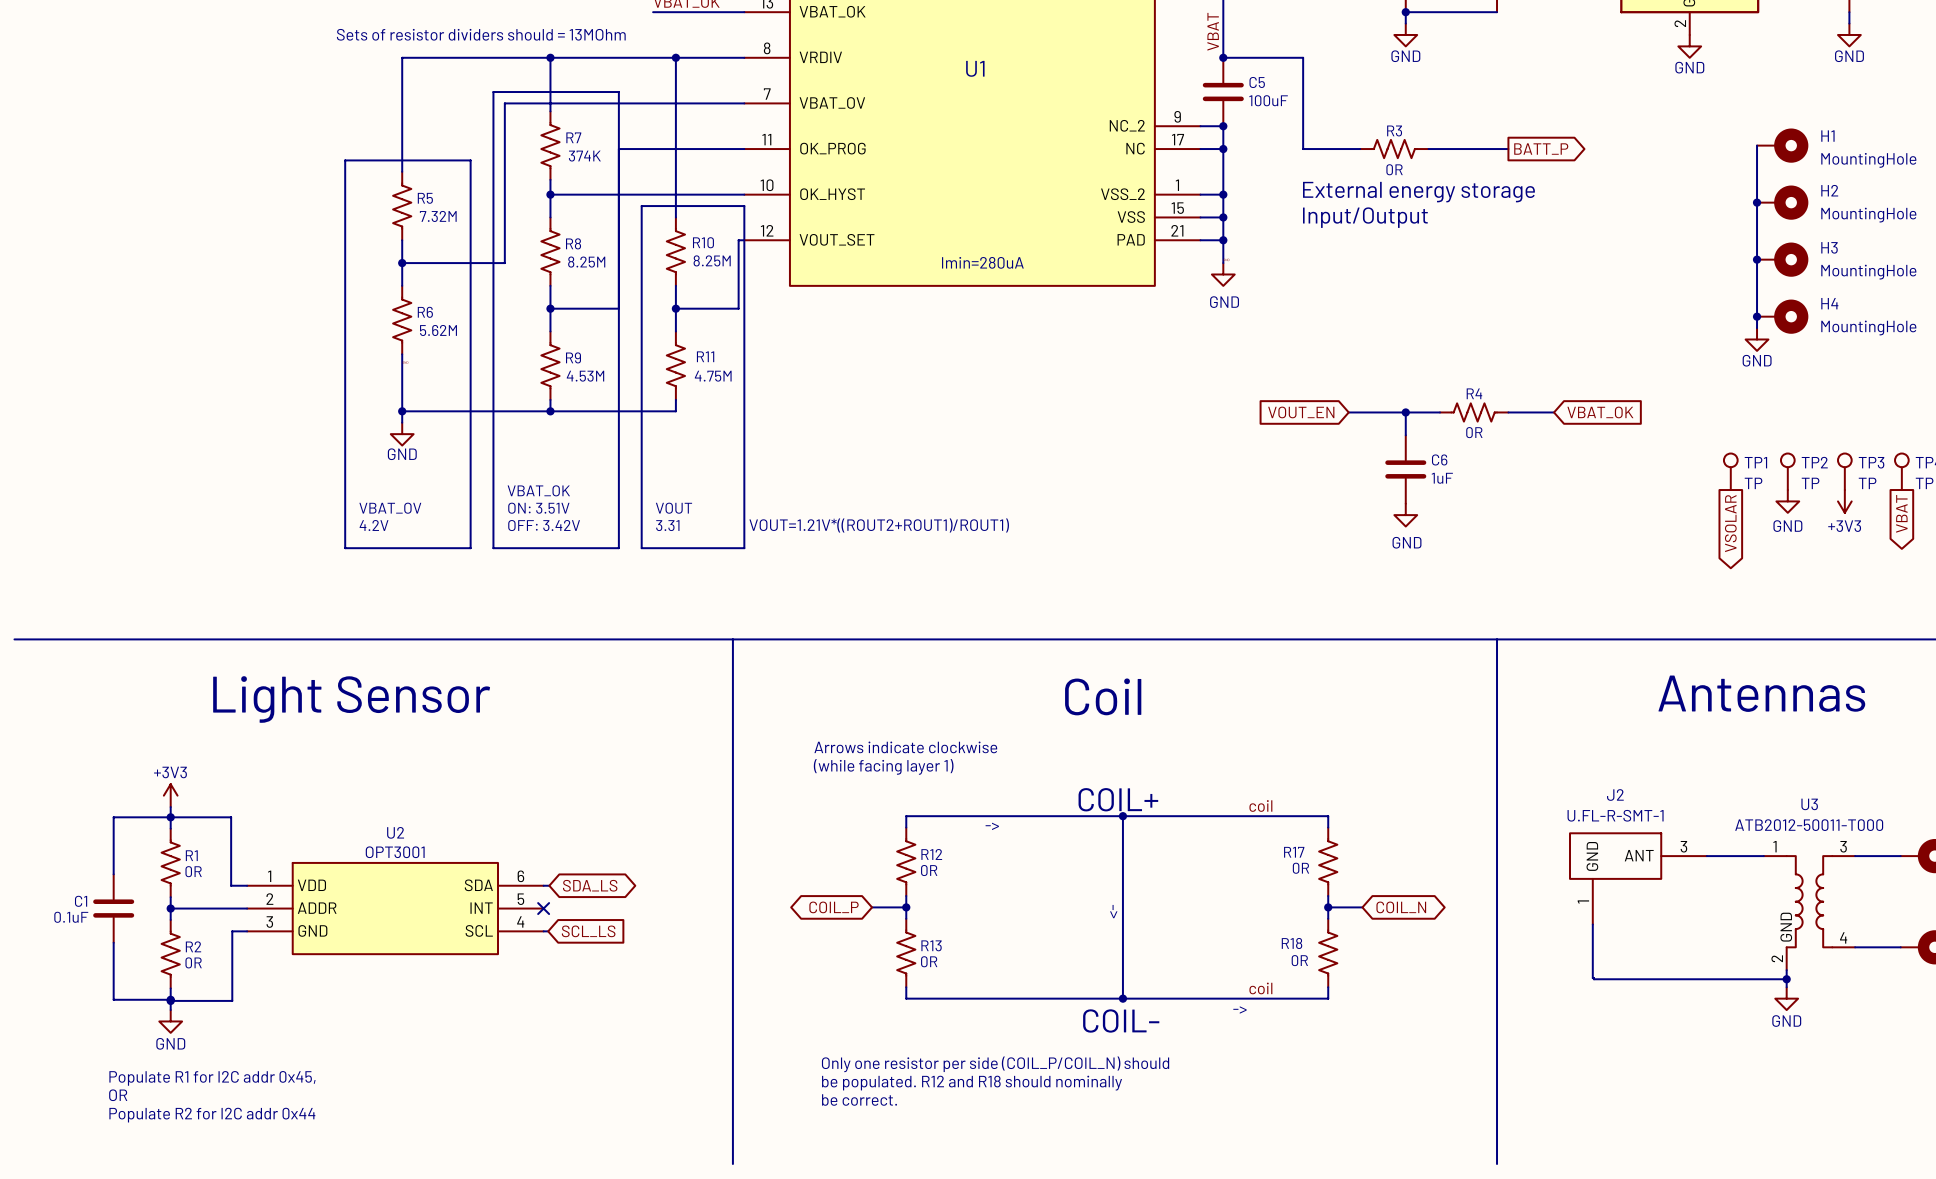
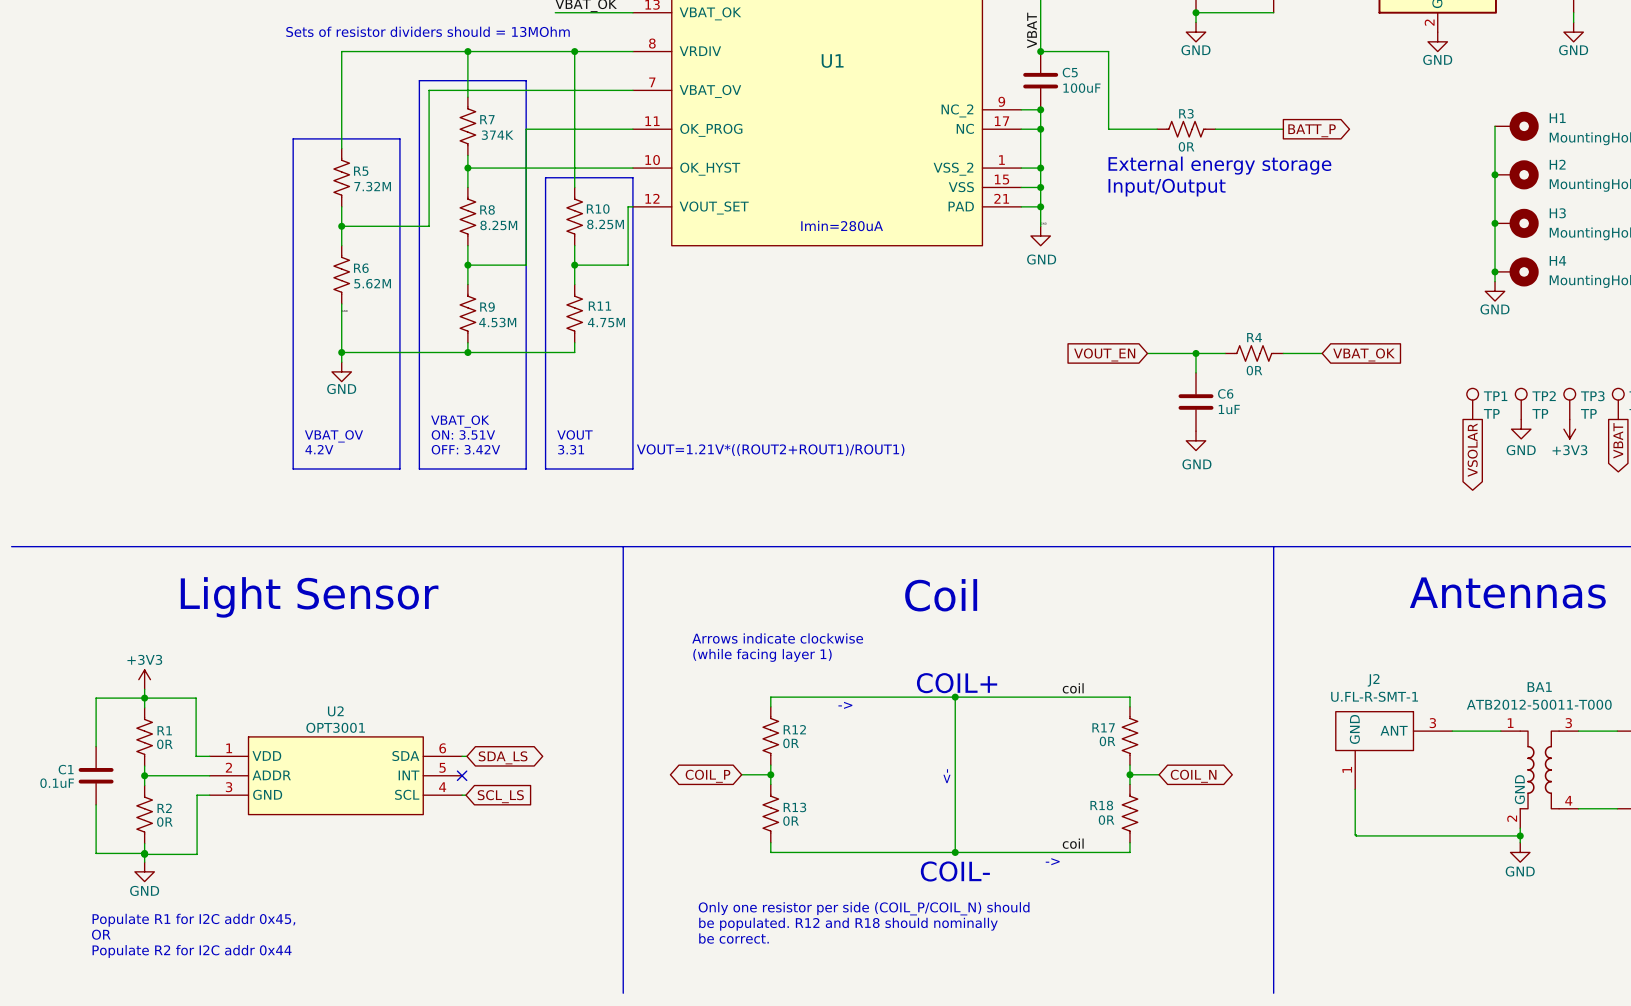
U3 name: U3 (1809, 804) -> BA1 (1539, 687)

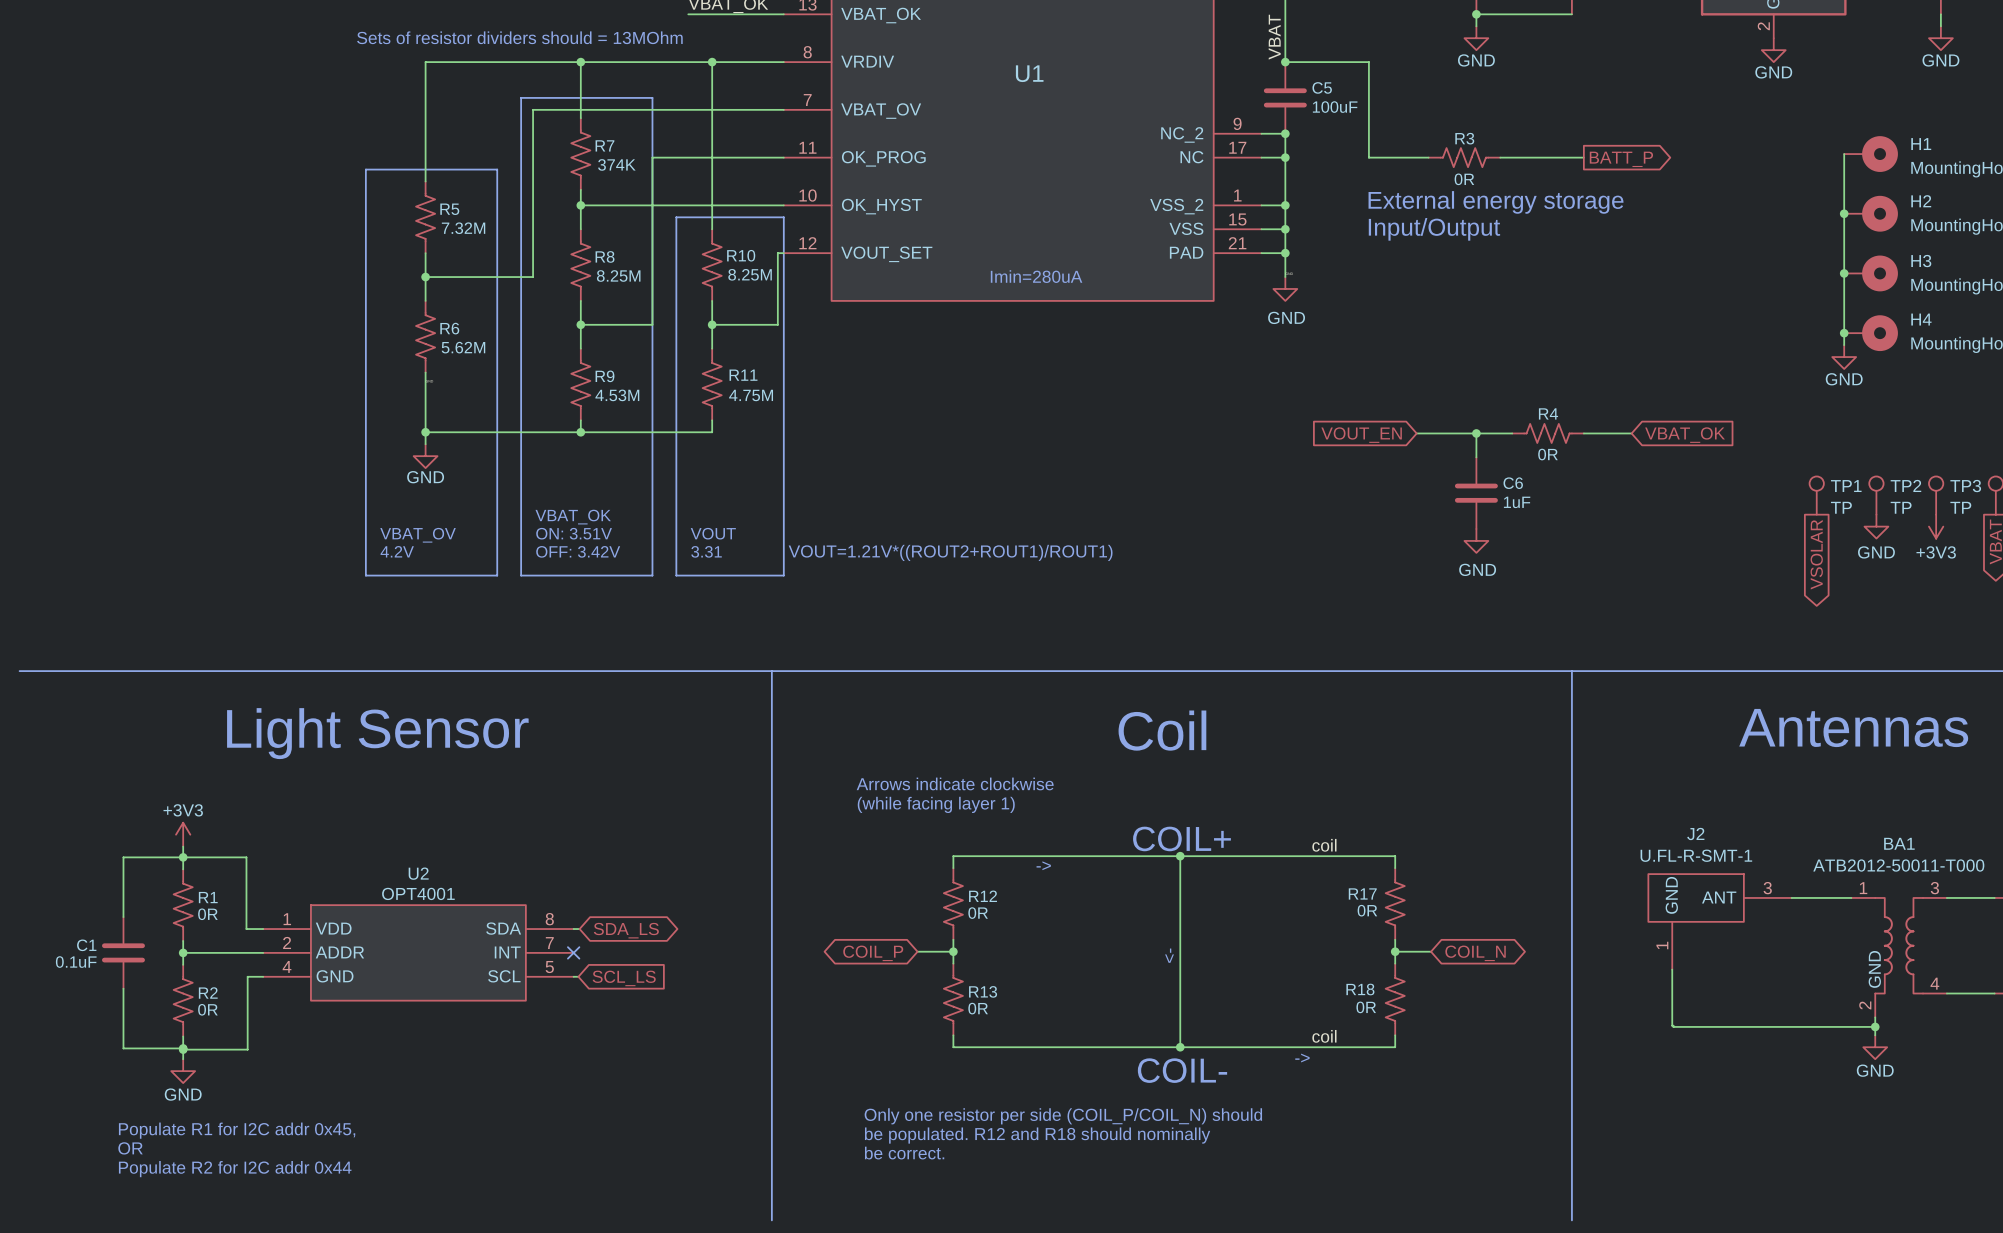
U2 value: OPT3001 (335, 727) -> OPT4001 (418, 893)
U2 pin number: 6 (442, 748) -> 8 (549, 919)
U2 pin number: 5 (442, 767) -> 7 (549, 943)
U2 pin number: 3 (229, 787) -> 4 (287, 966)
U2 pin number: 4 (442, 787) -> 5 (549, 967)

